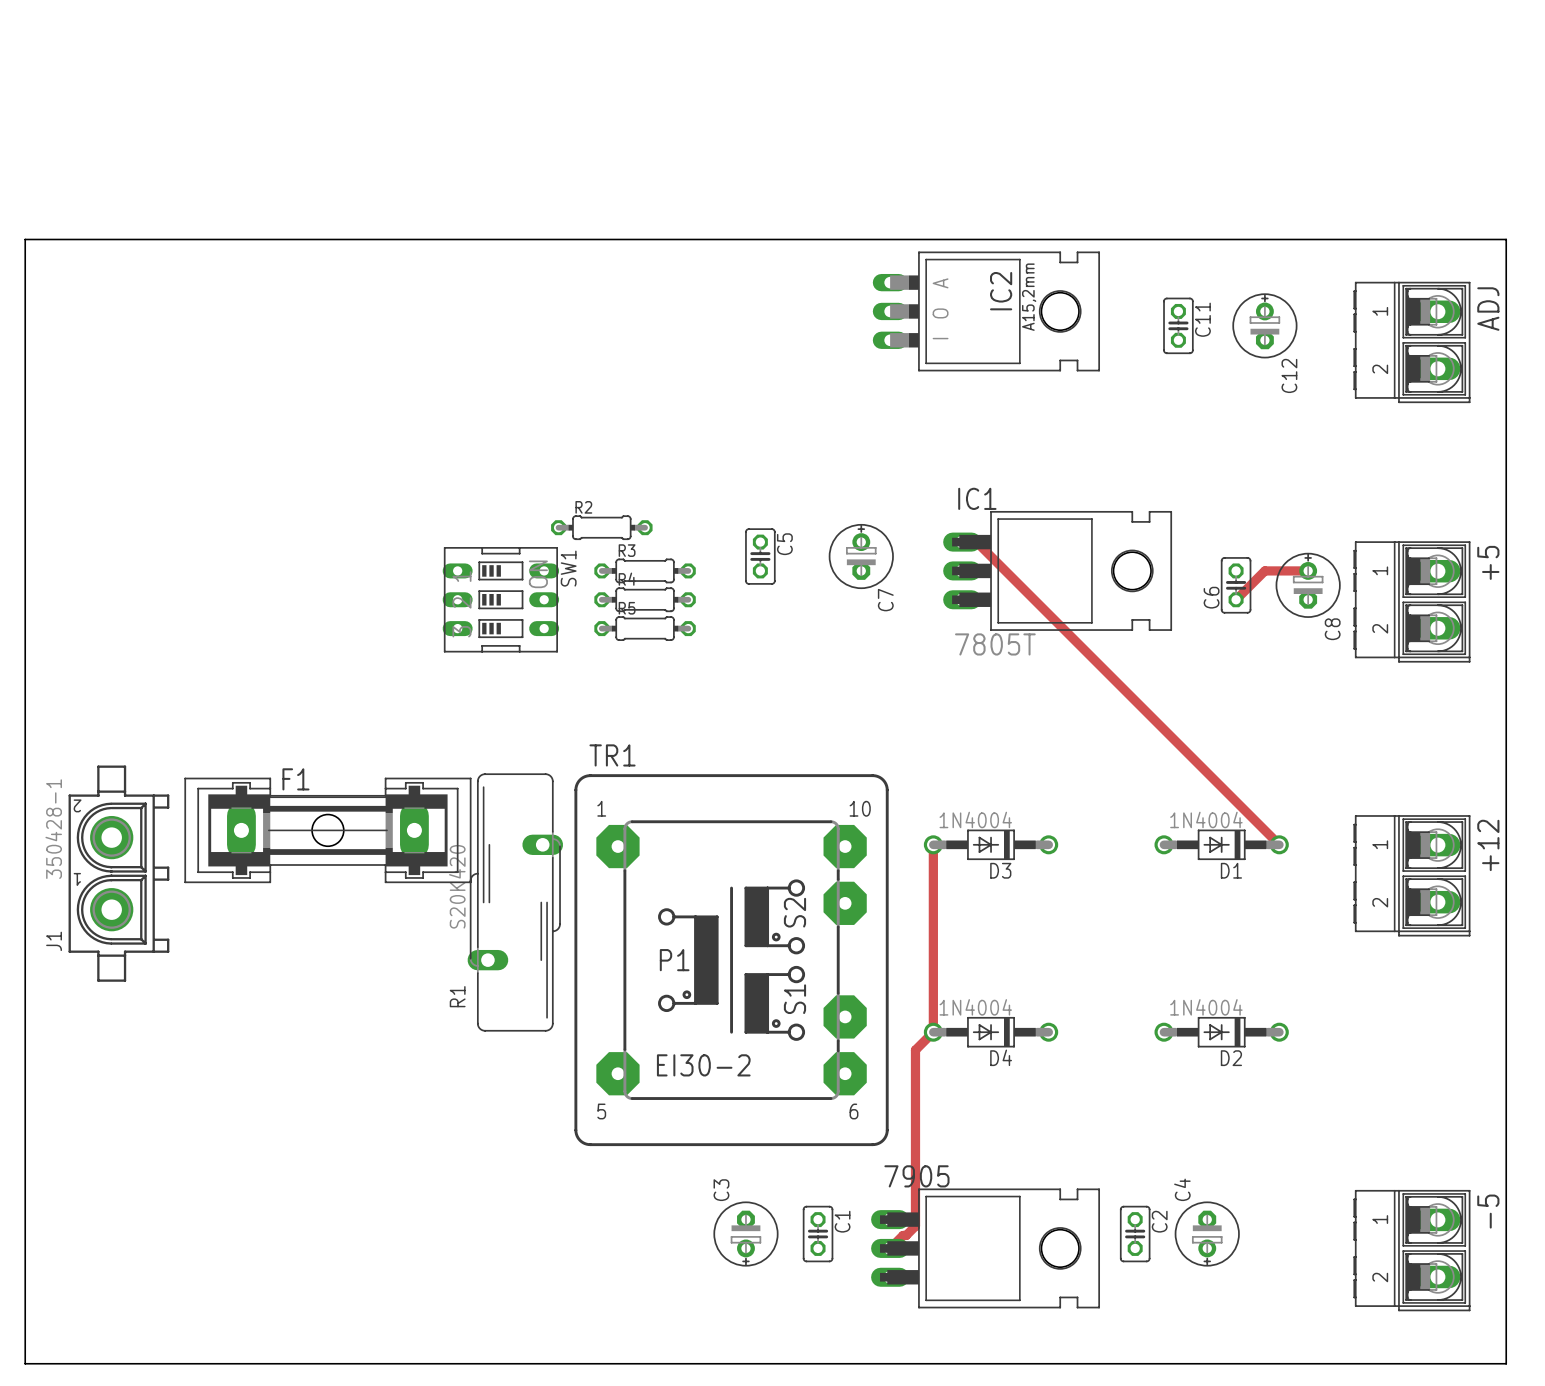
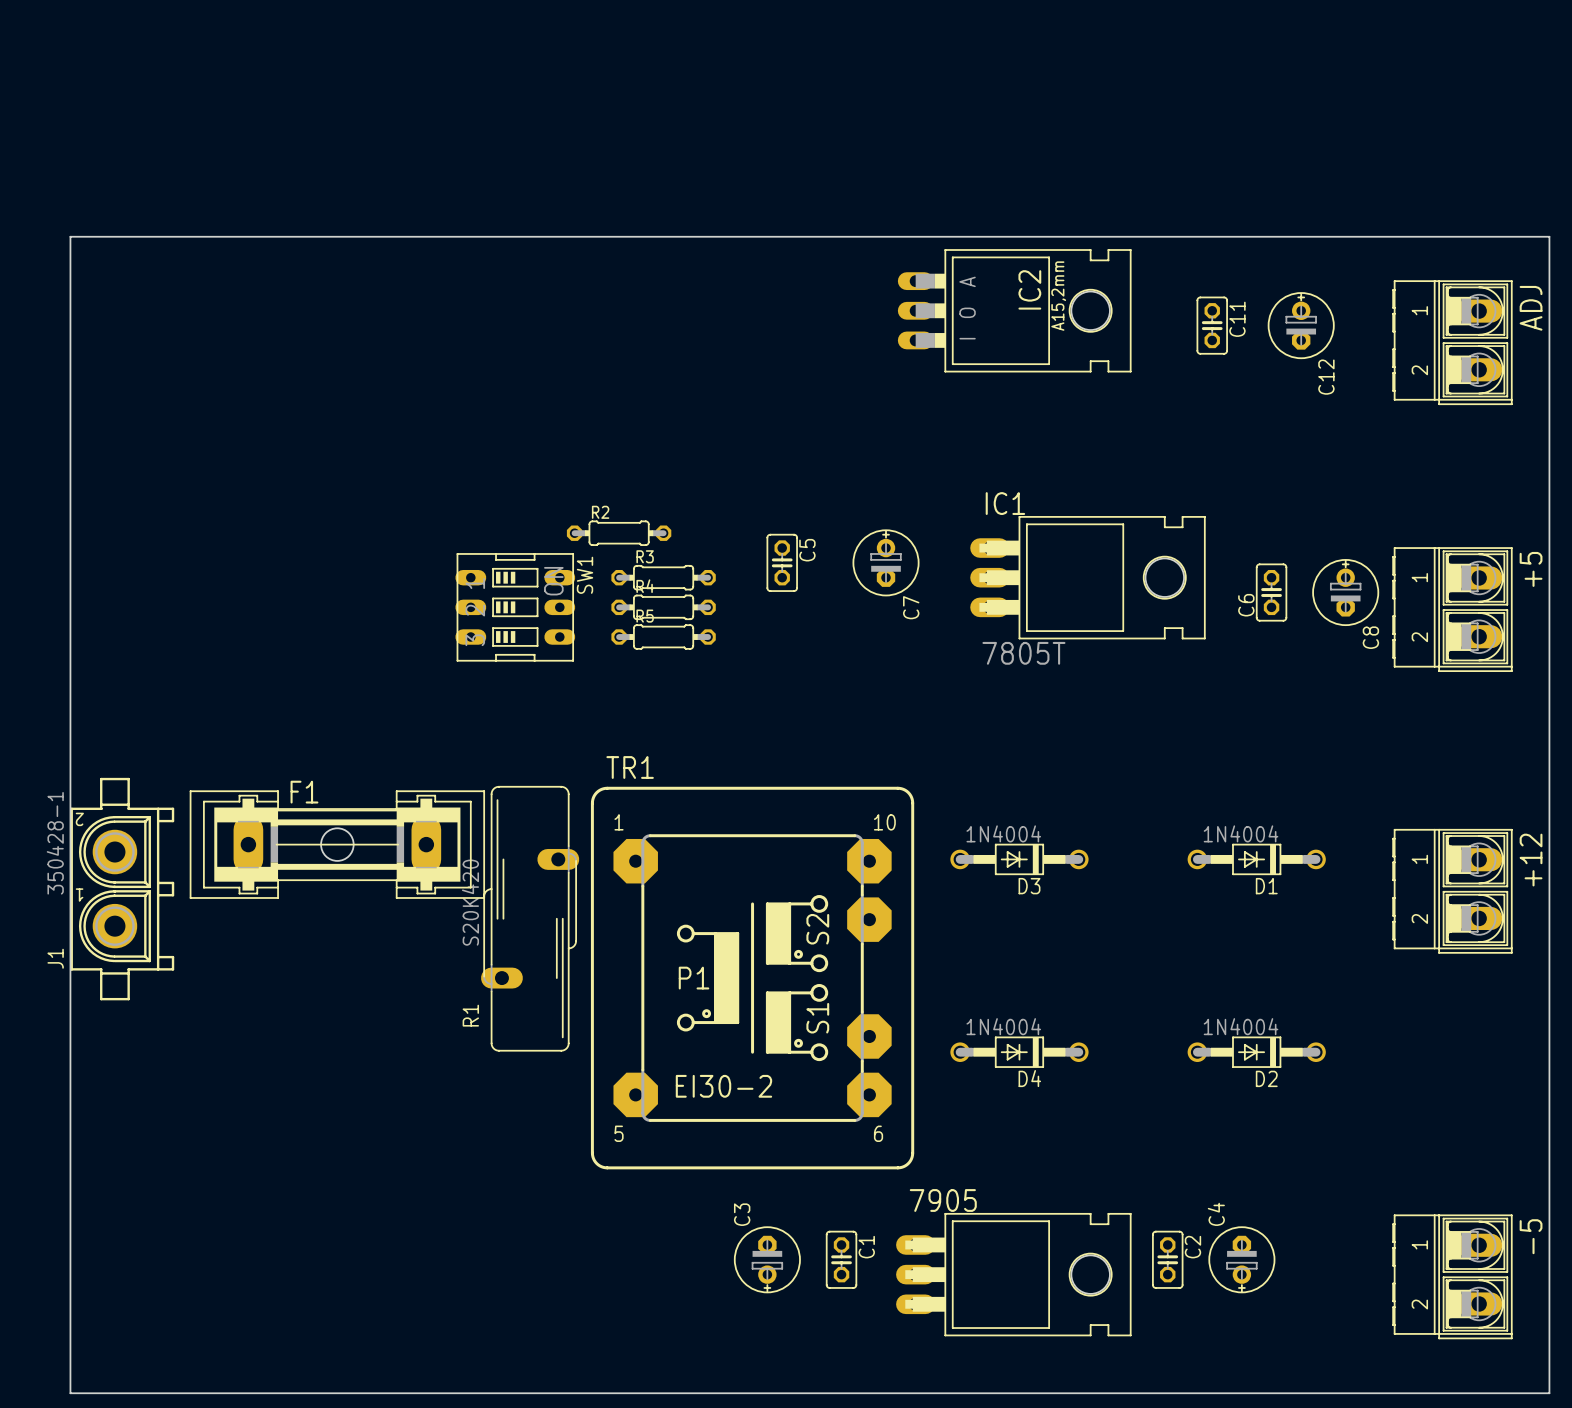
board edge: (68, 239) (25, 239) (25, 1363) (68, 1363) -> (70, 236) (70, 1393)
track: (962, 542) (976, 542) (1279, 844) -> none
track: (1308, 570) (1264, 570) (1236, 599) -> none
track: (933, 844) (933, 1032) (915, 1050) (915, 1226) (890, 1248) -> none

